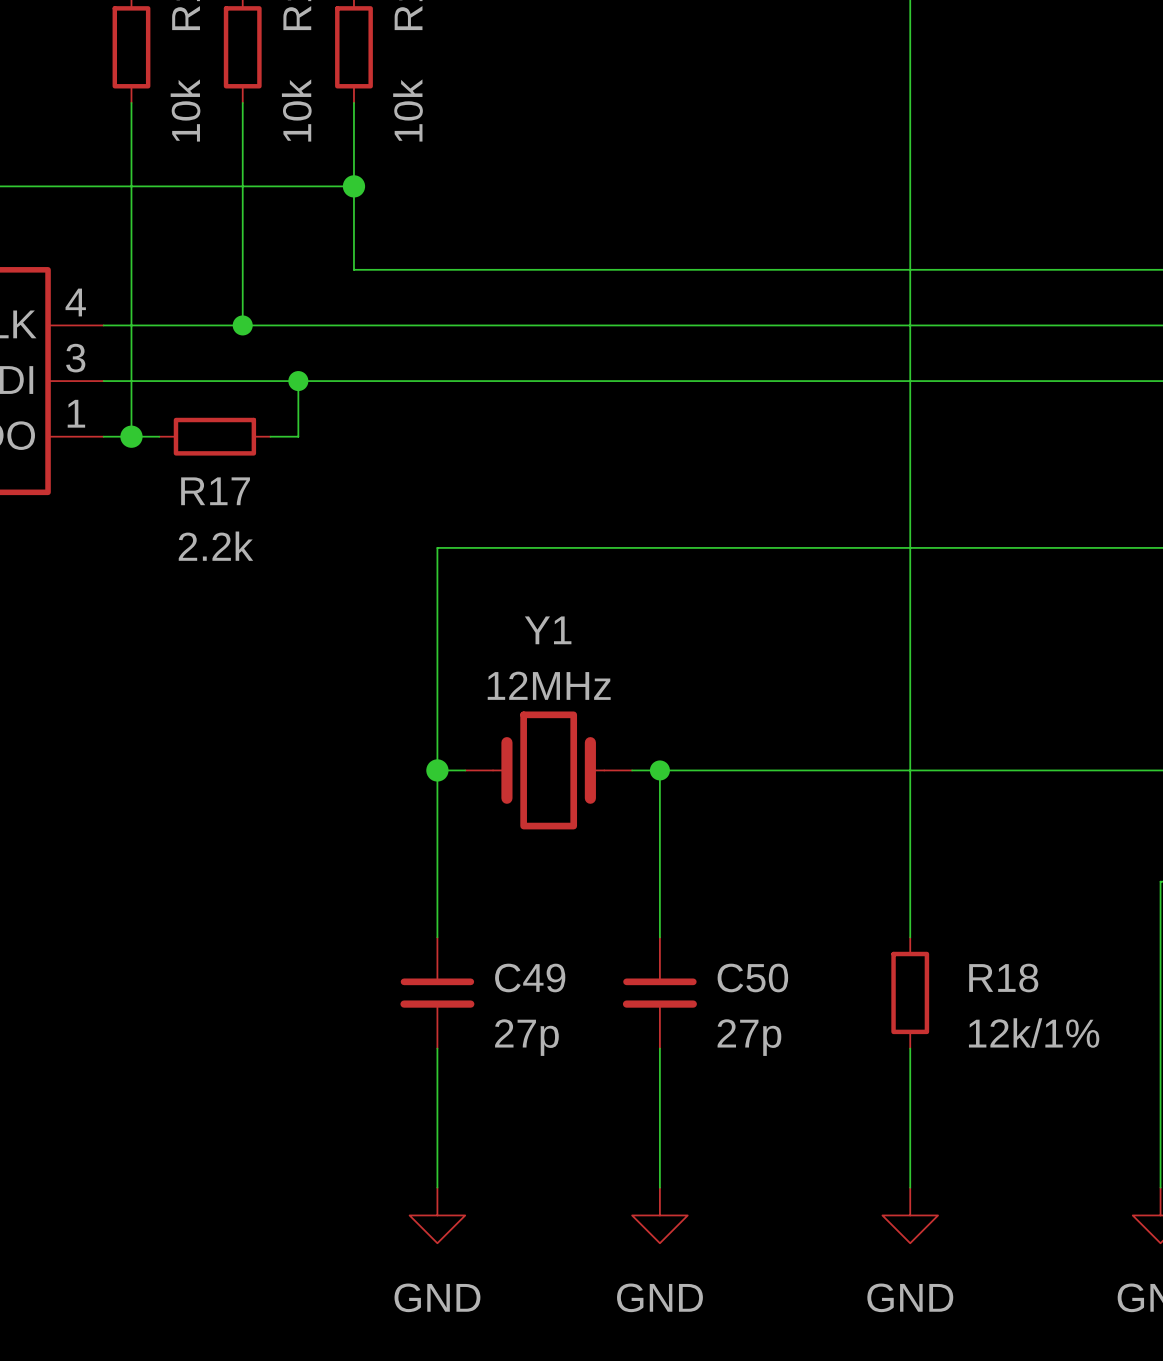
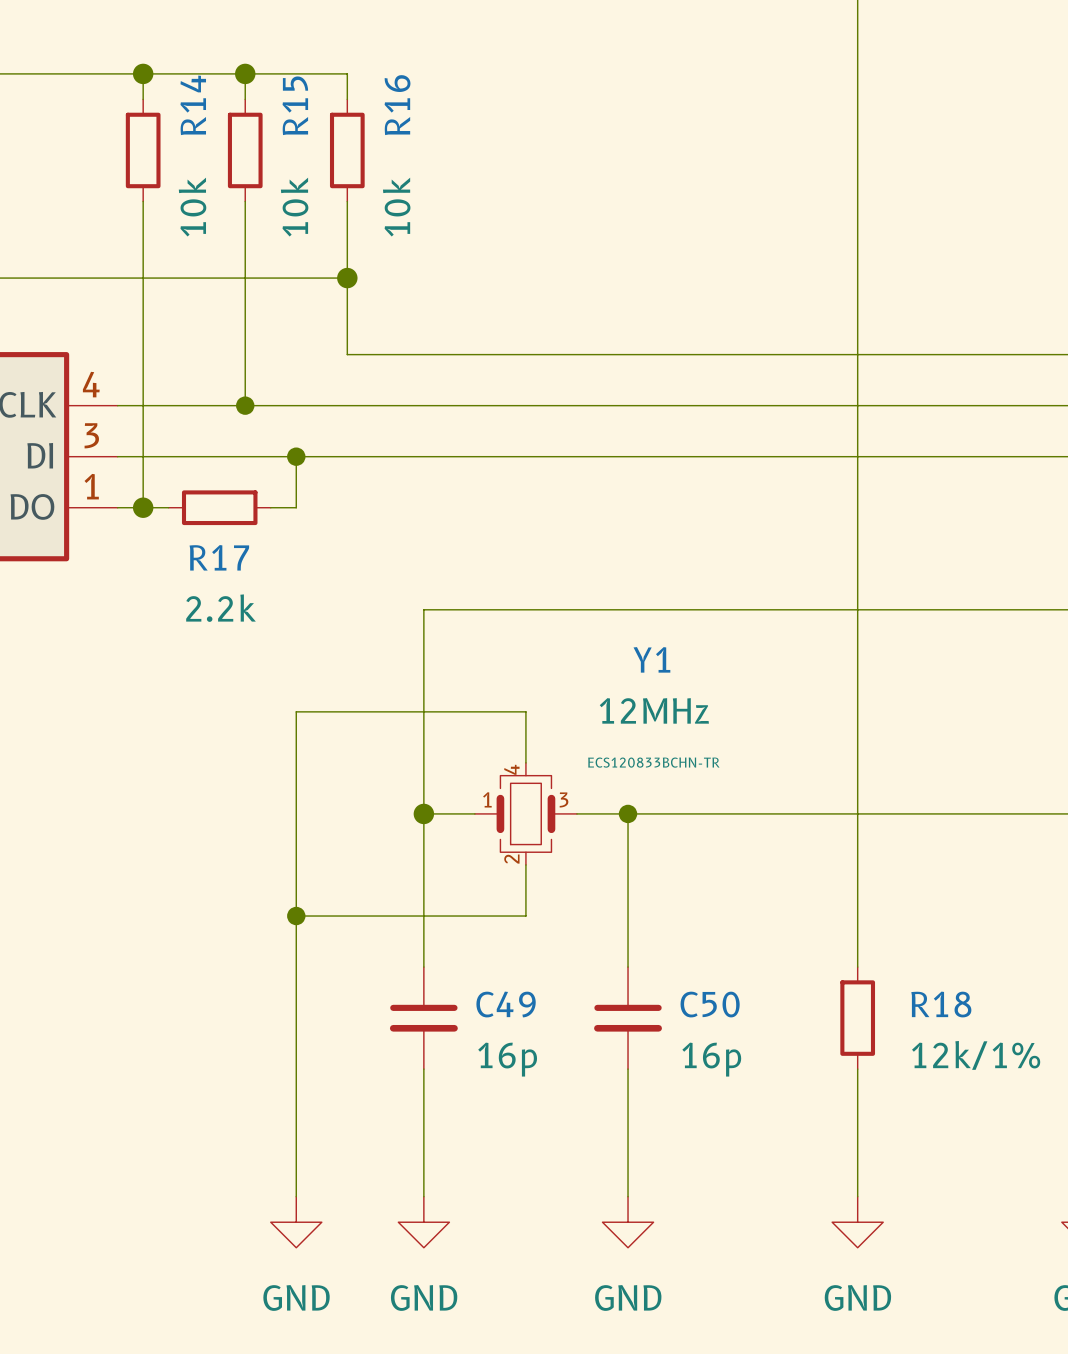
Y1 name position: Y1 (548, 630) -> Y1 (651, 659)
Y1 value position: 12MHz (549, 685) -> 12MHz (654, 710)
Y1 symbol: [465, 711, 633, 830] -> [474, 762, 577, 865]
wire: none -> (525, 762) (525, 711) (296, 711) (296, 1196)
Y1 text: none -> ECS120833BCHN-TR (653, 762)
wire: none -> (525, 864) (525, 916) (296, 916)
junction: none -> (296, 916)
C49 value: 27p (526, 1037) -> 16p (507, 1059)
C50 value: 27p (749, 1037) -> 16p (711, 1059)
power symbol: none -> GND (296, 1222)

